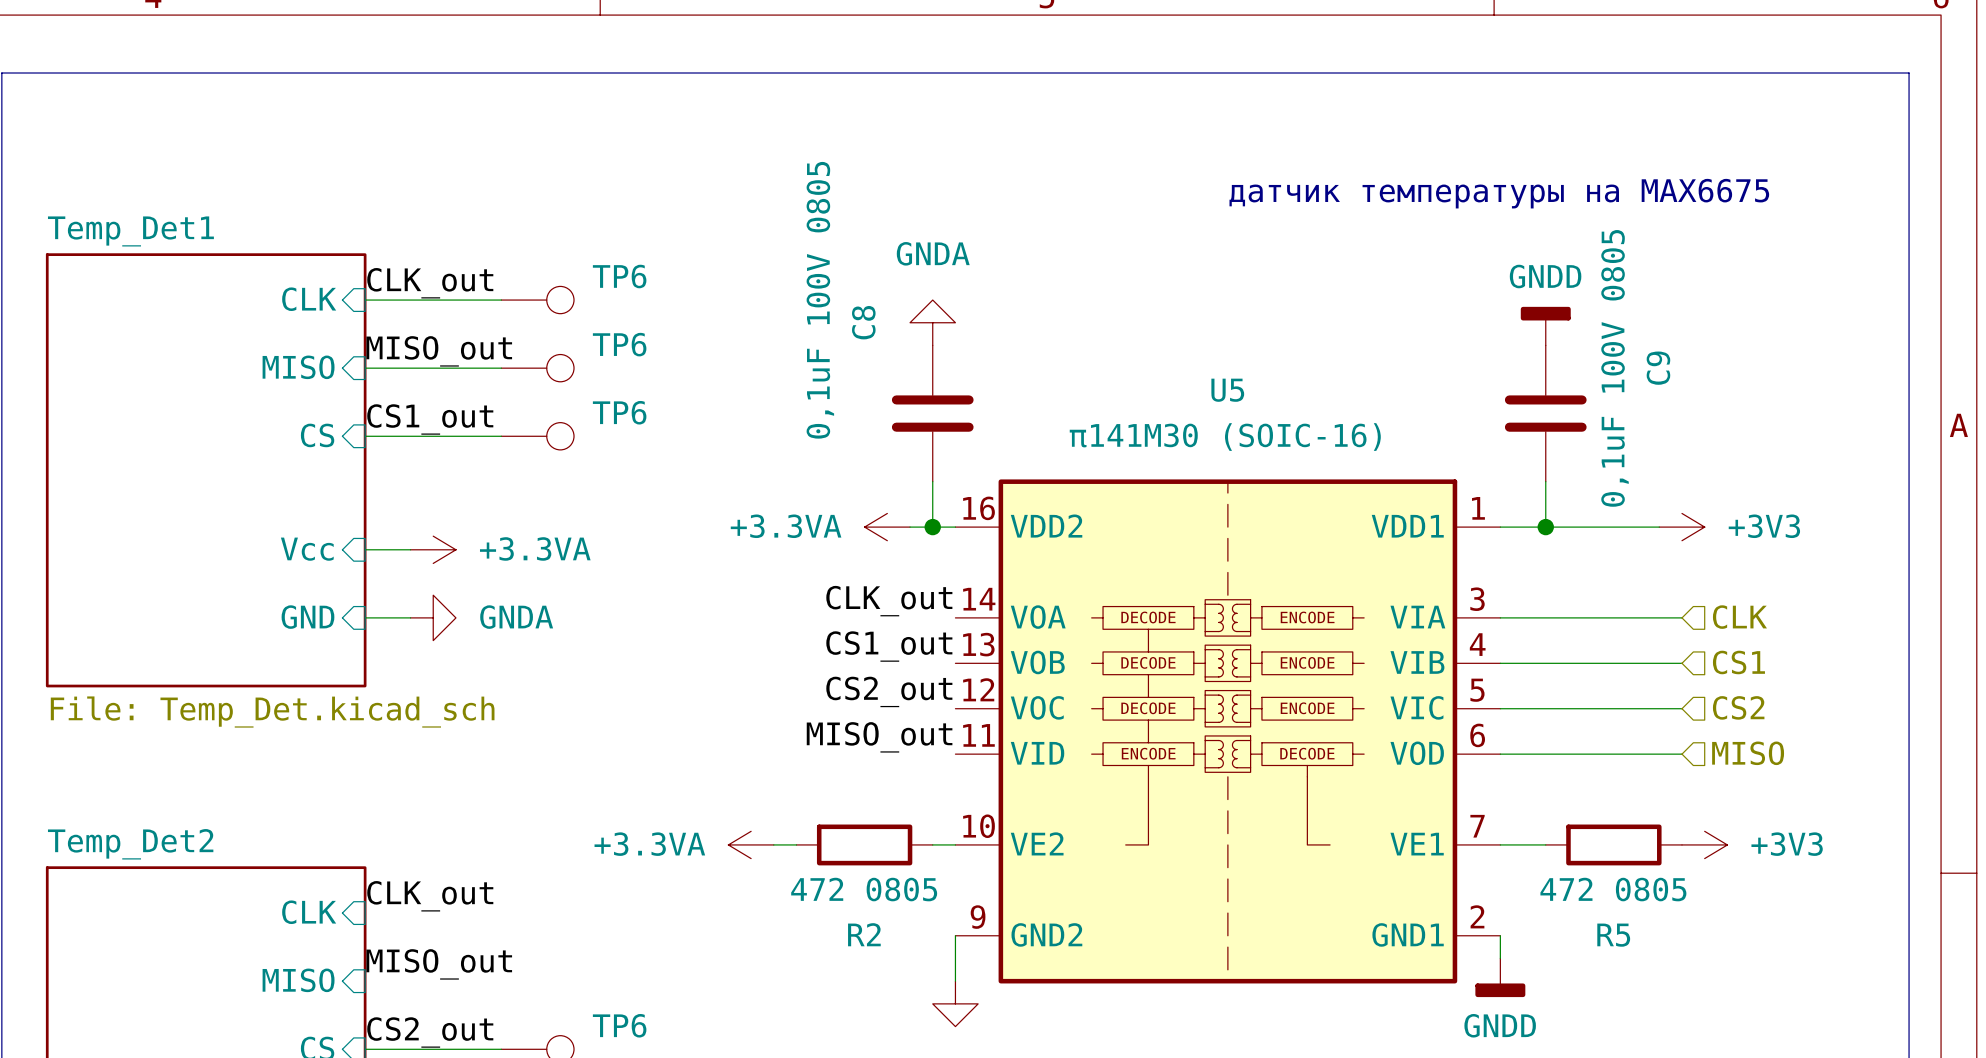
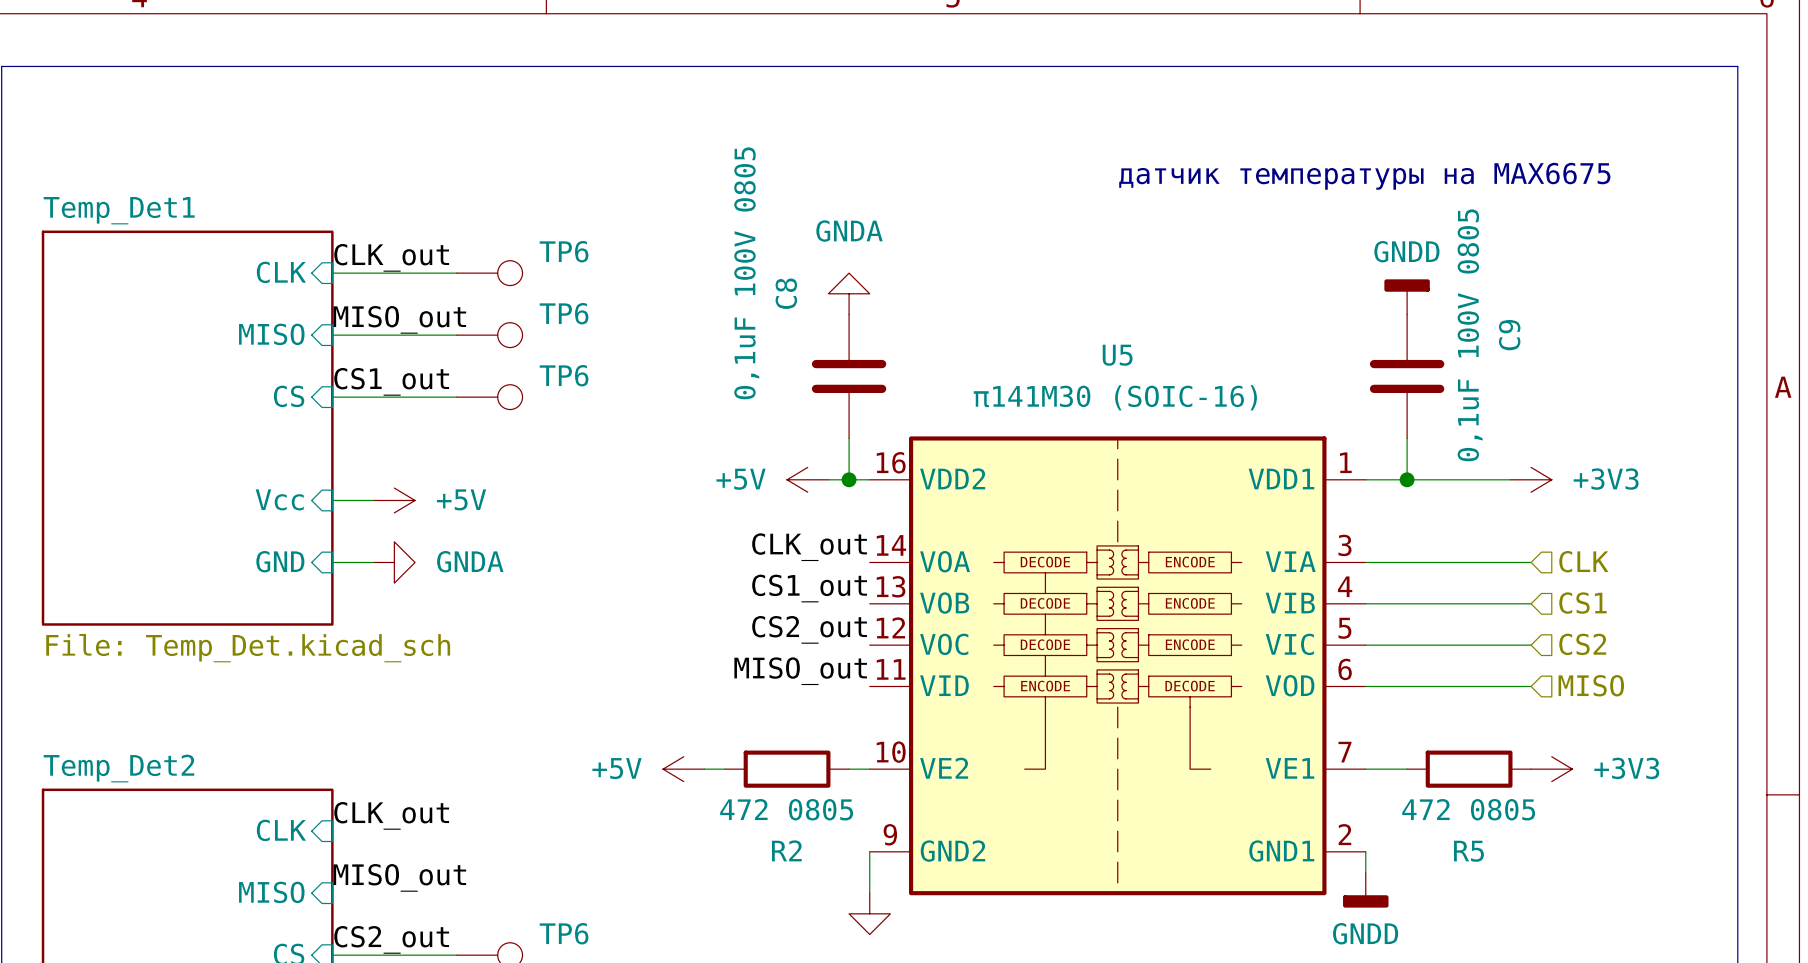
power symbol: +3.3VA (887, 527) -> +5V (807, 479)
power symbol: +3.3VA (433, 549) -> +5V (394, 500)
power symbol: +3.3VA (751, 844) -> +5V (683, 769)

